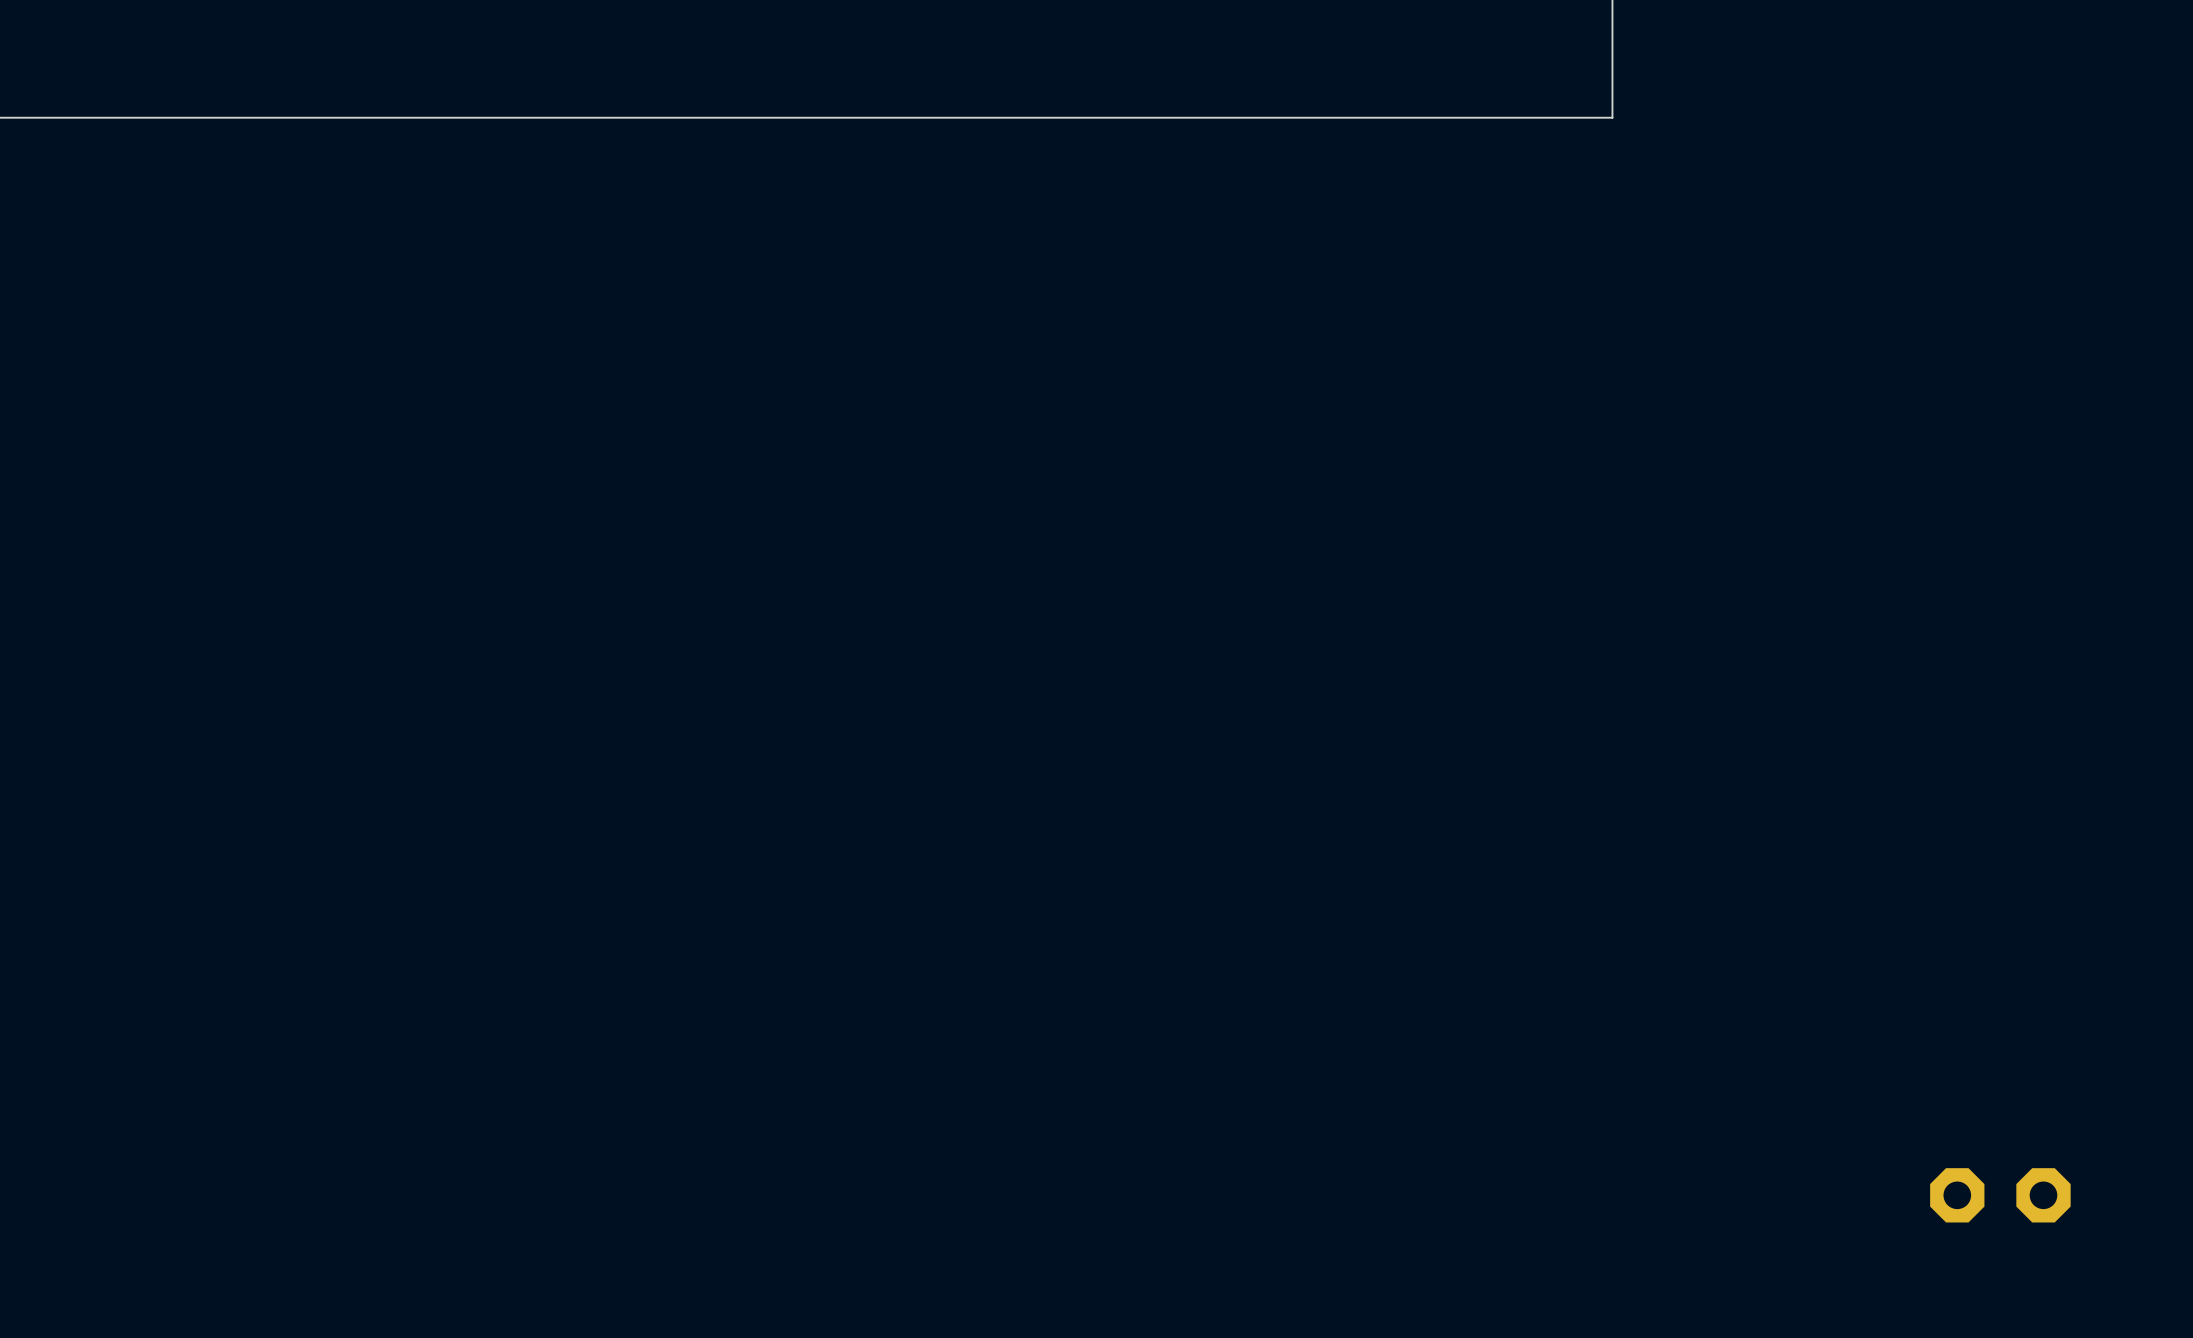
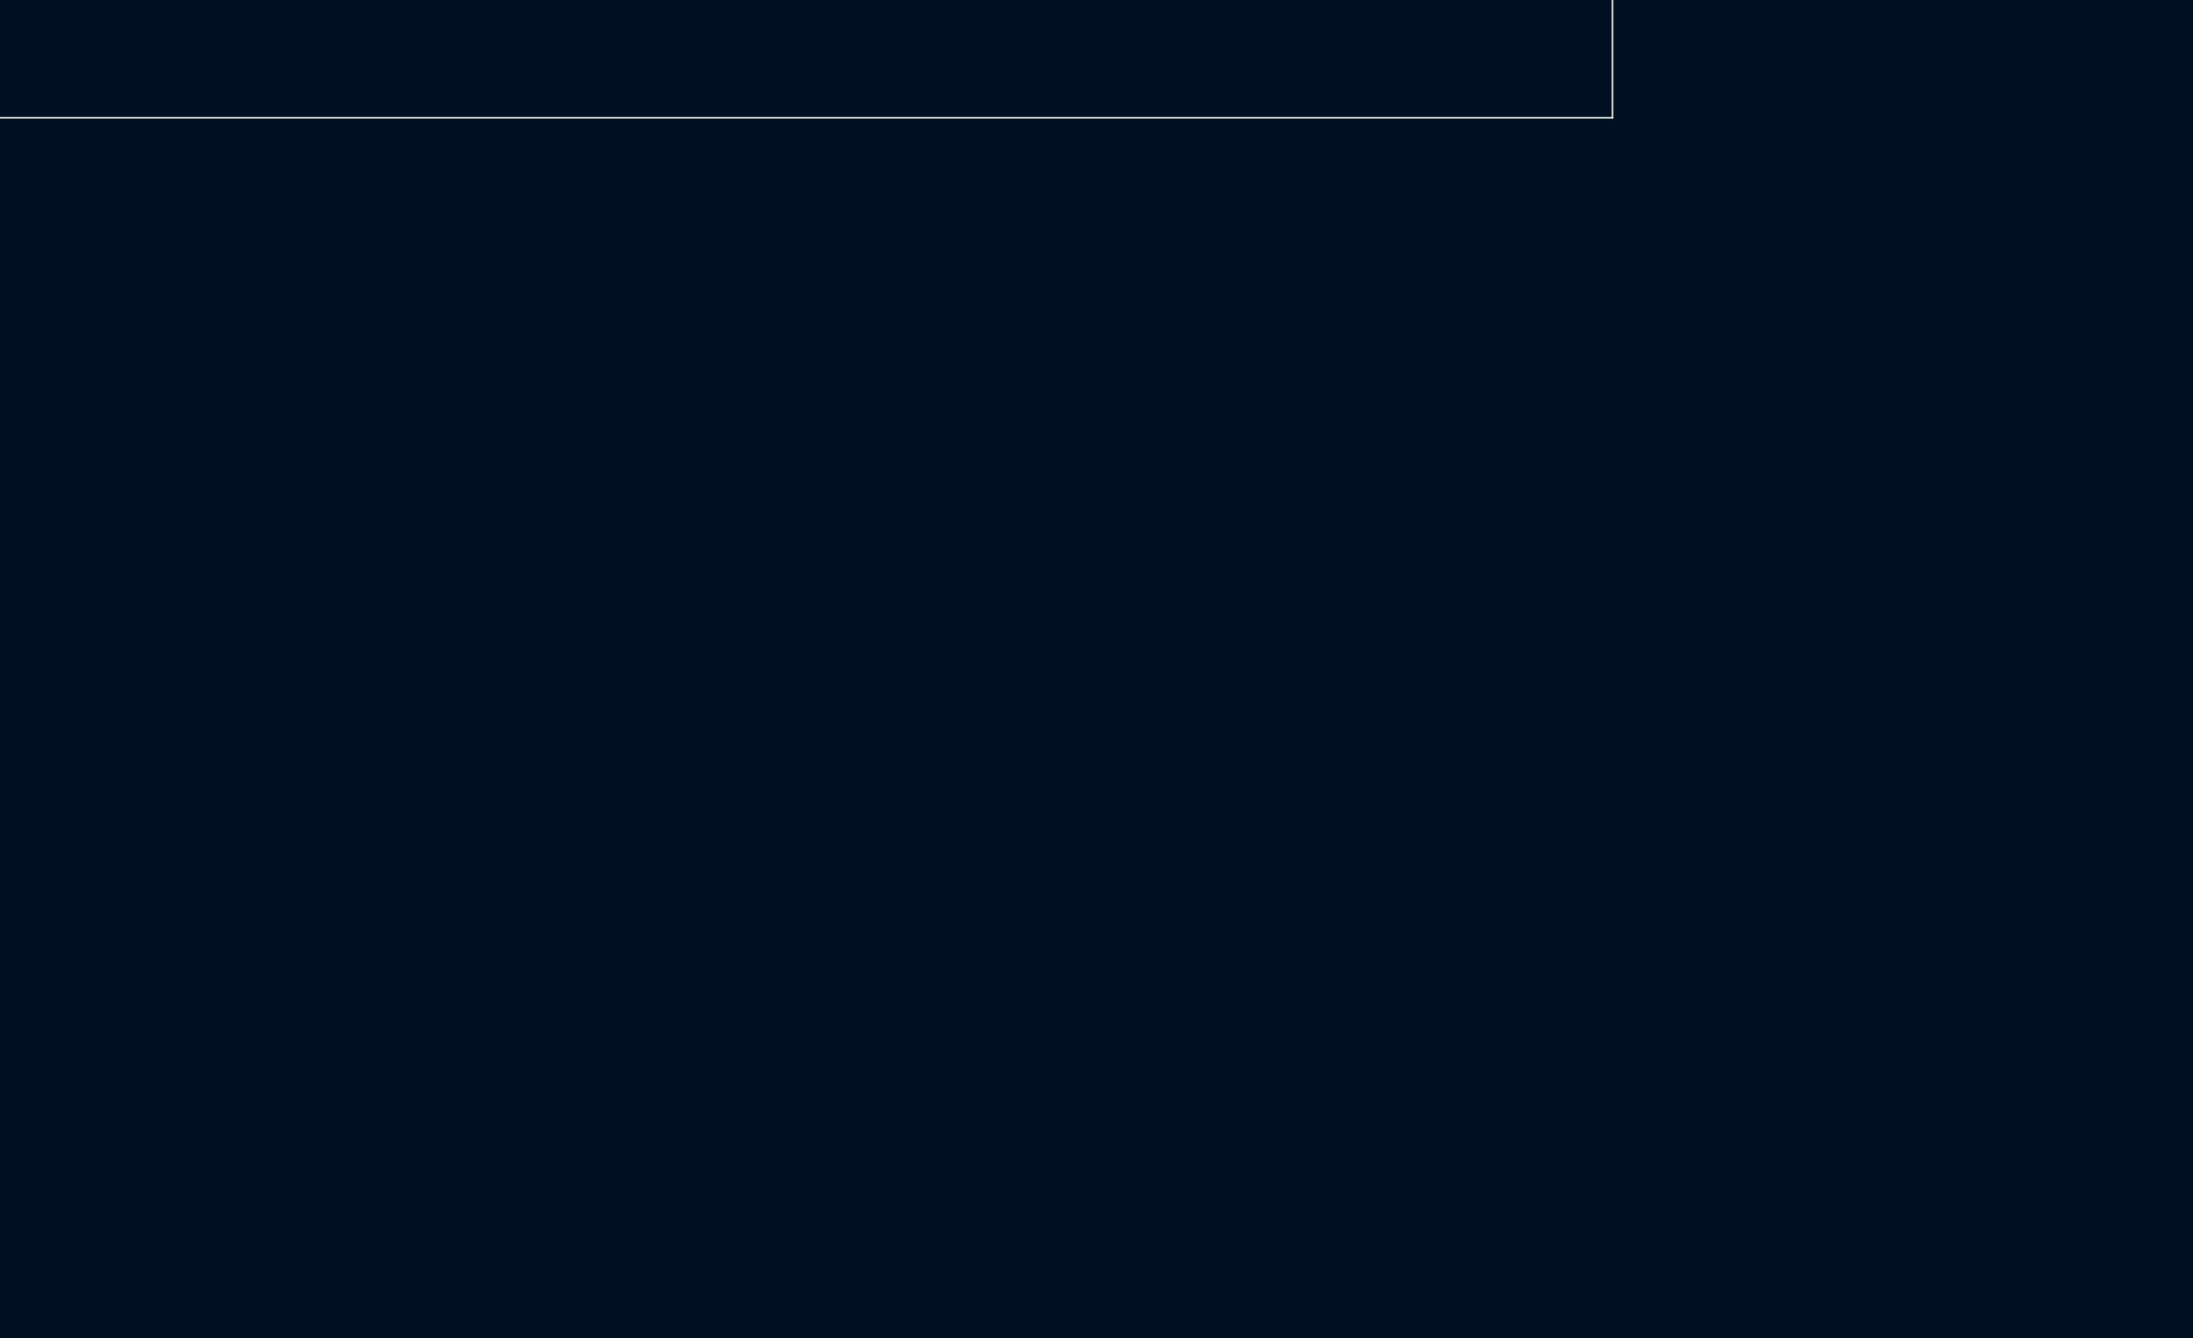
part: (2000, 1195) -> none

